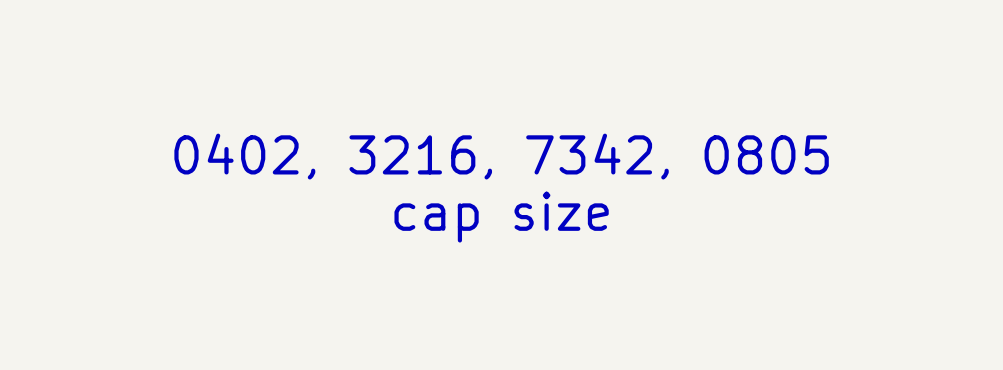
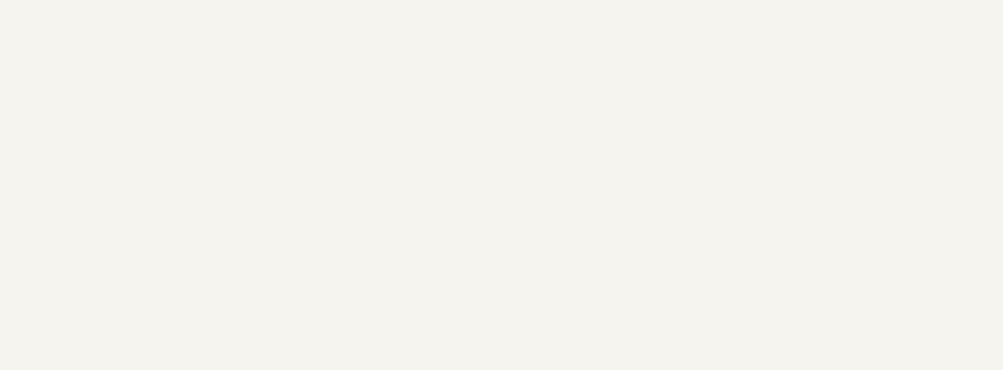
text: 0402, 3216, 7342, 0805 (501, 156) -> none
text: cap size (501, 217) -> none

